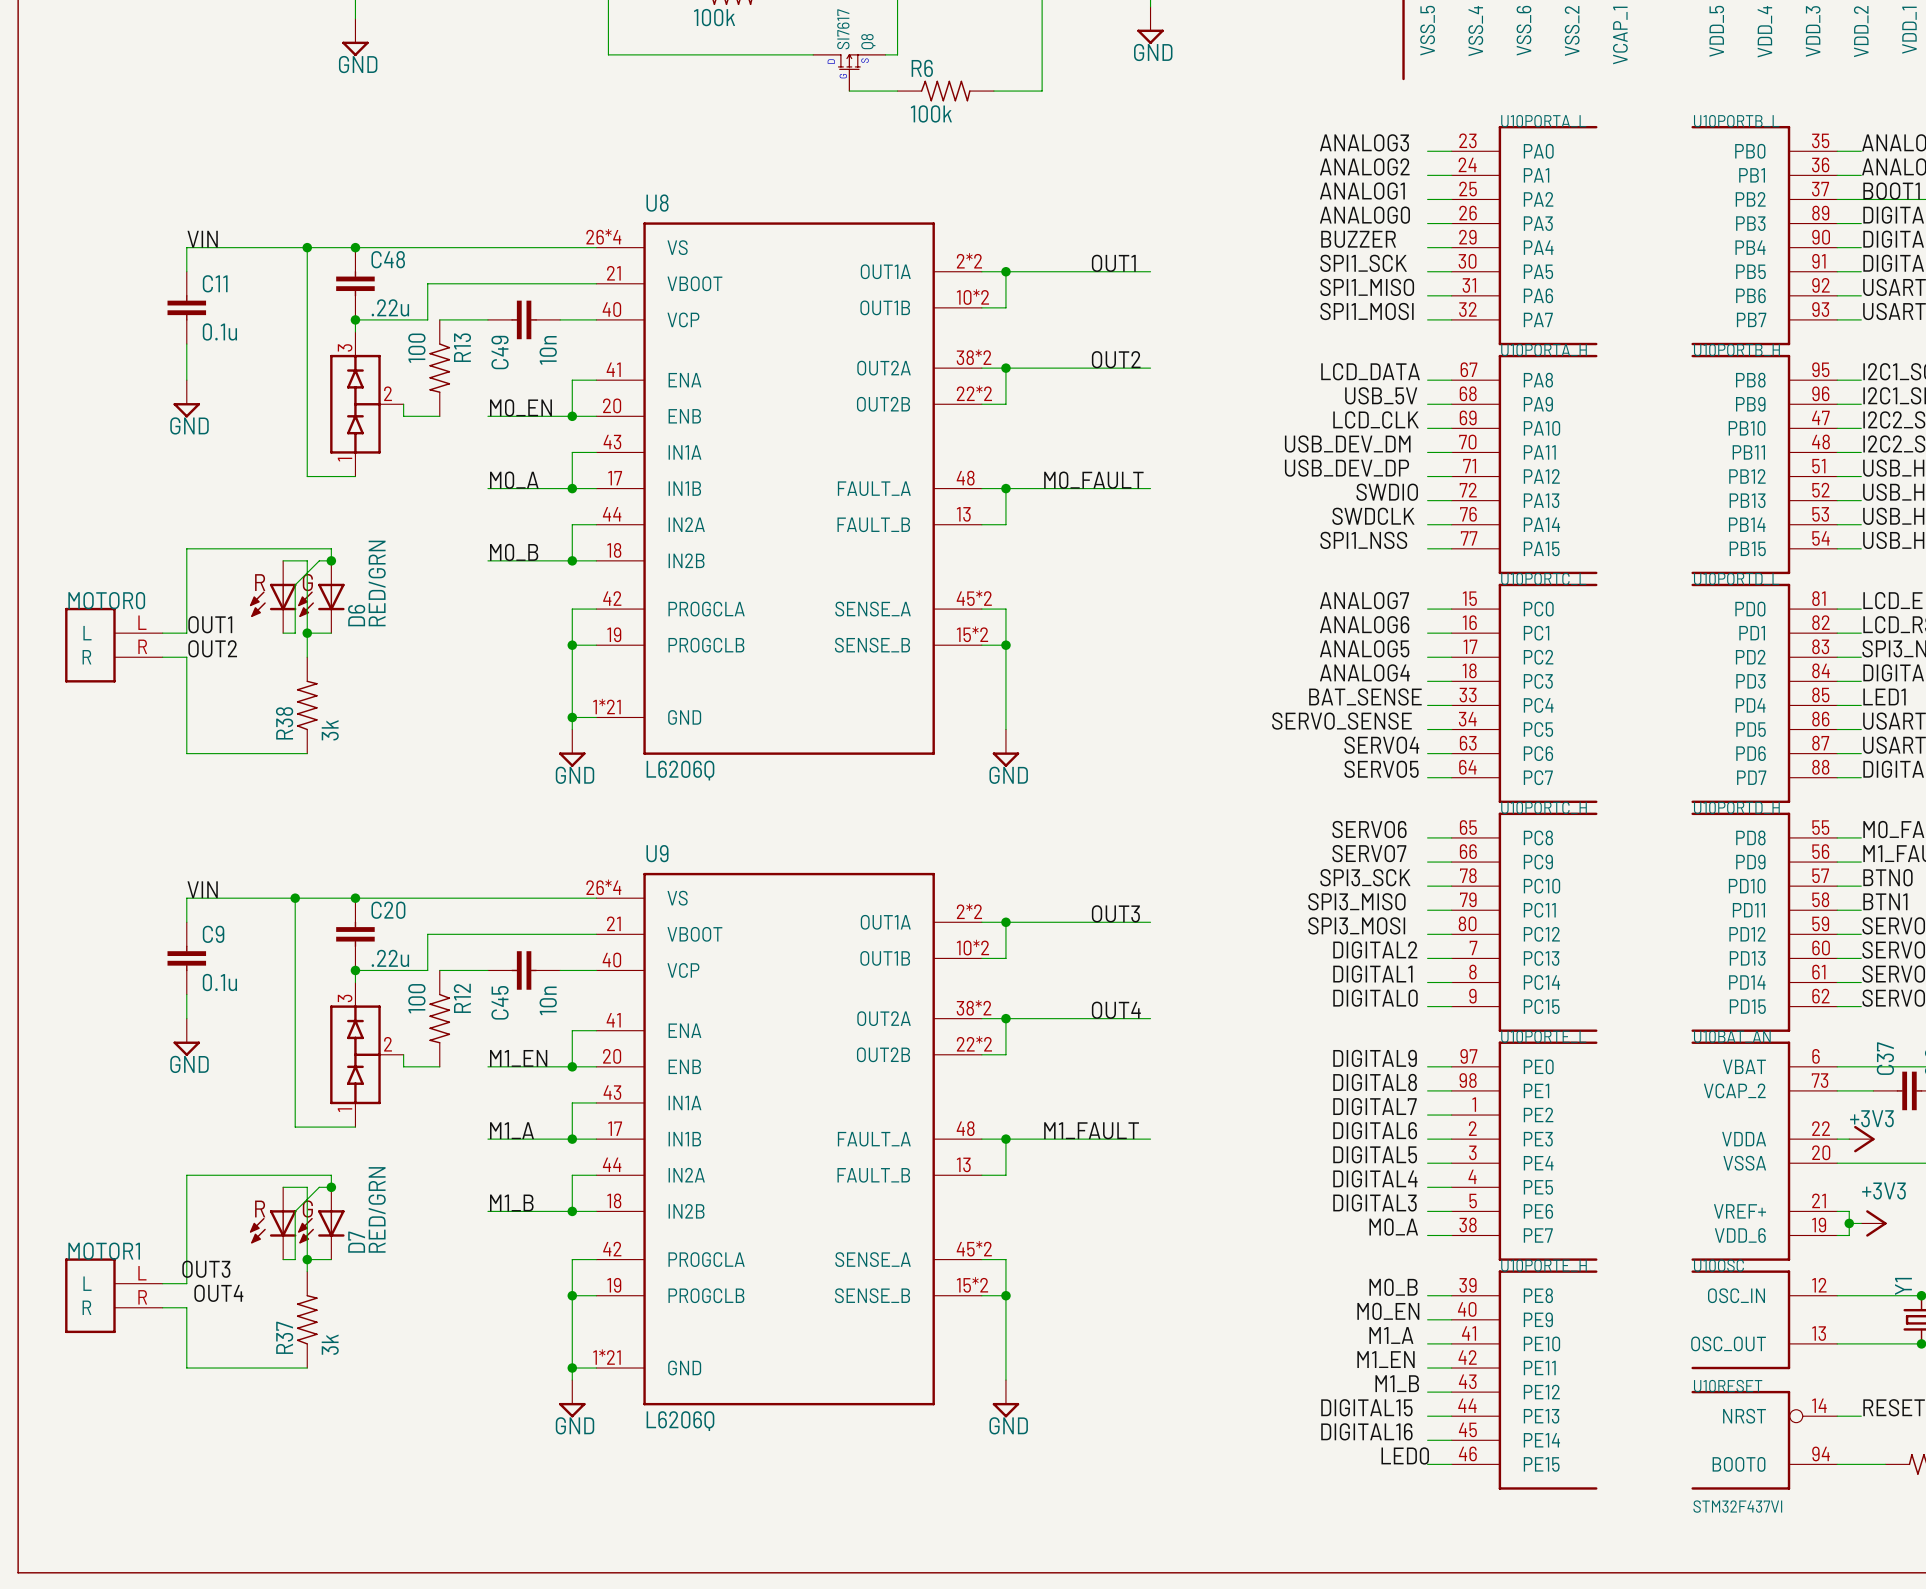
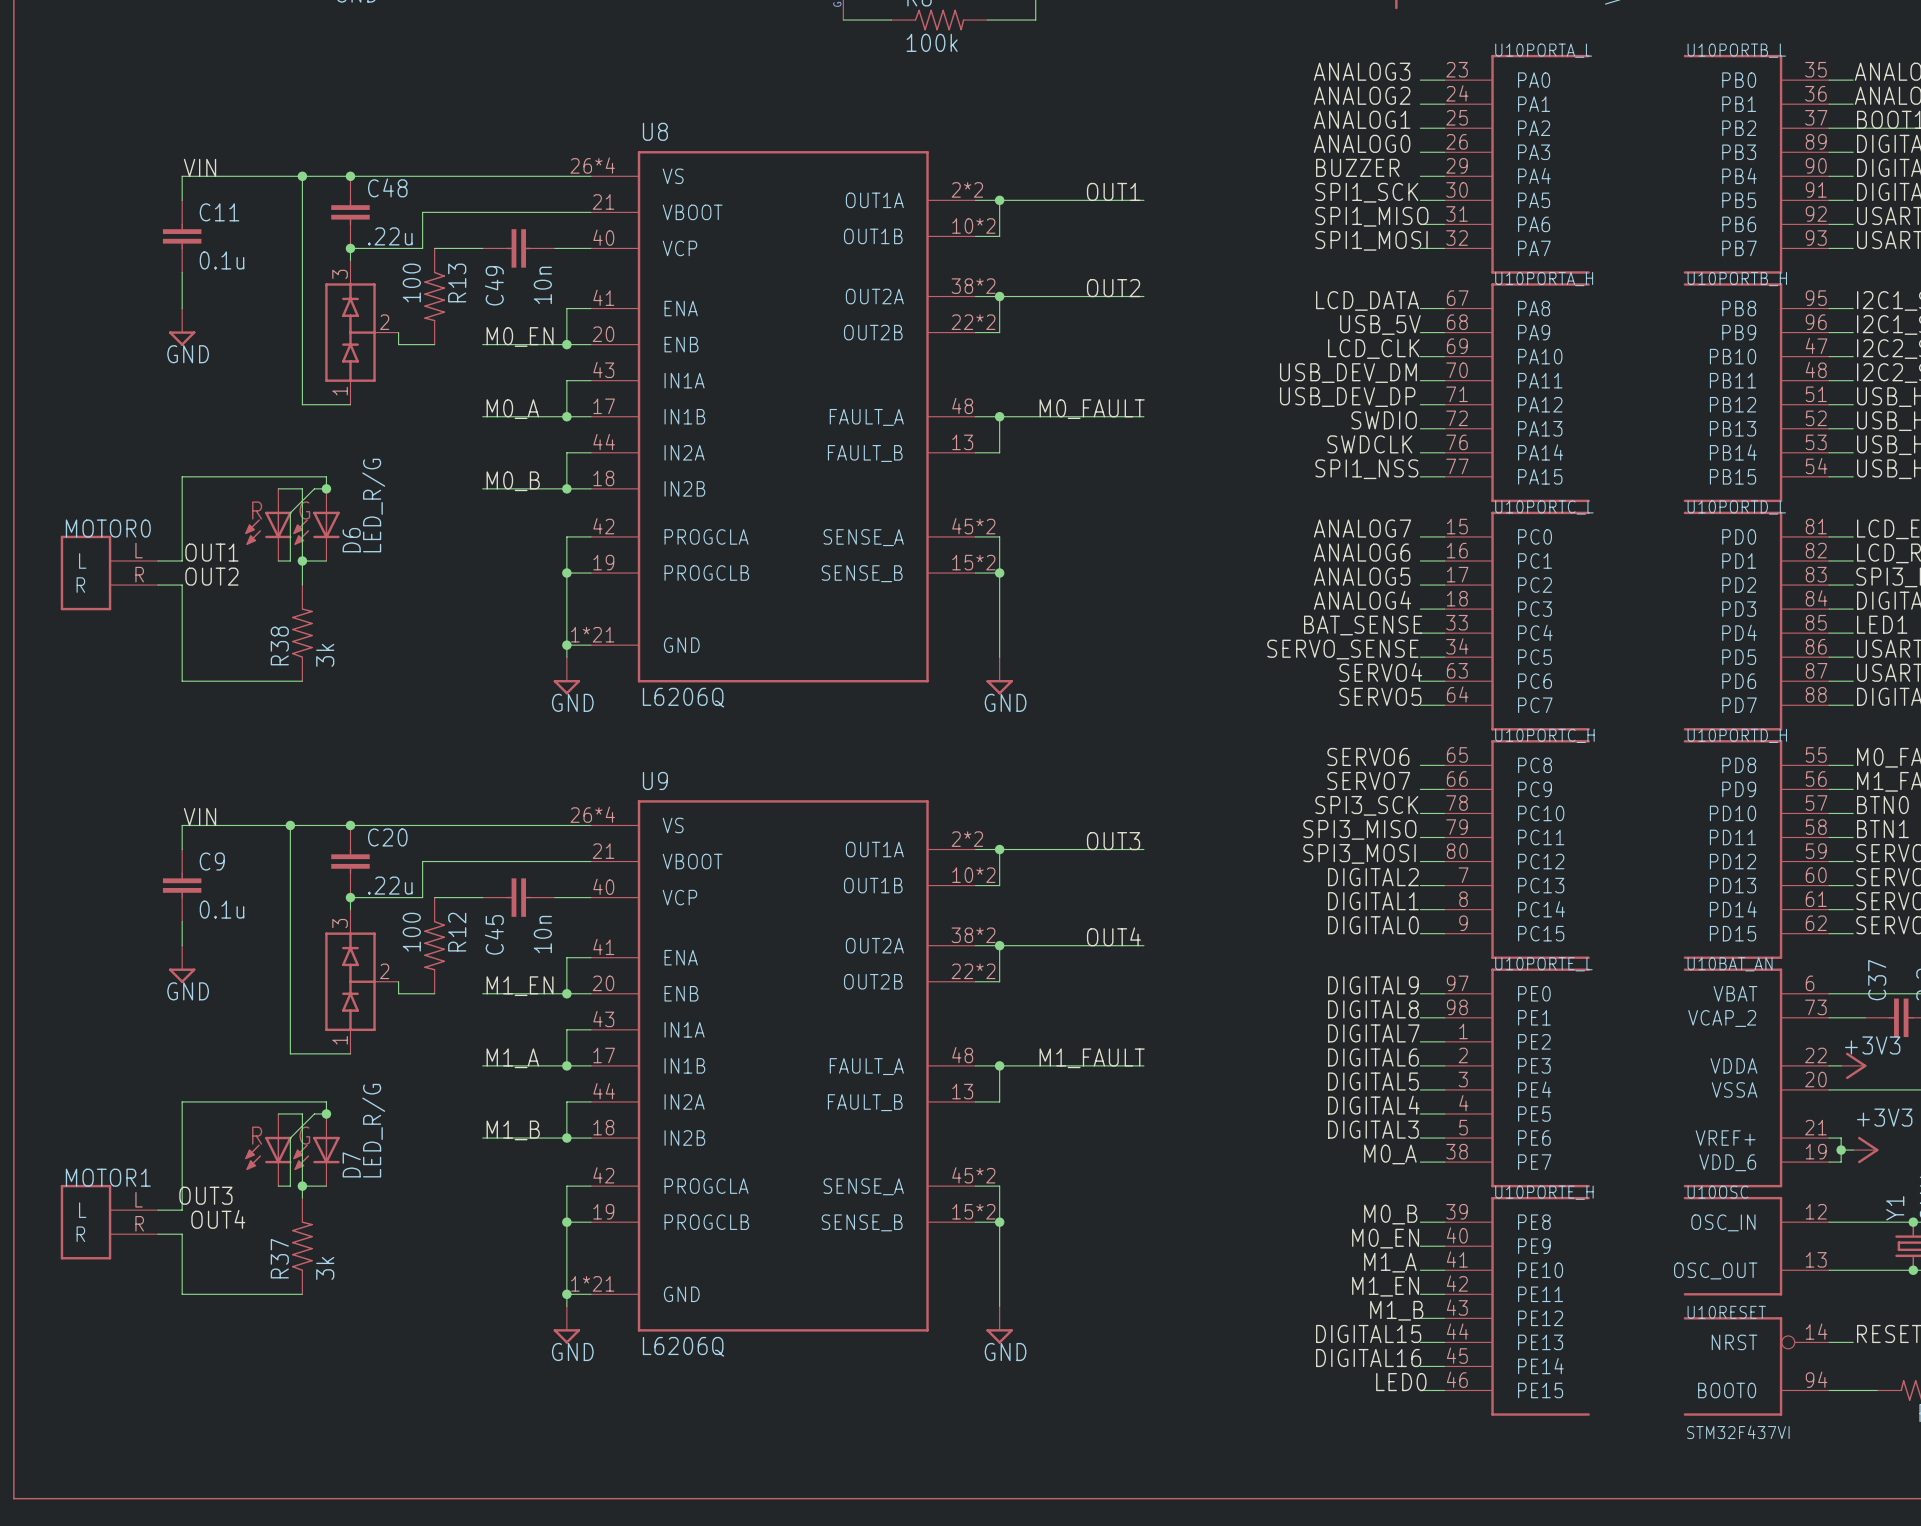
D6 value: RED/GRN (377, 583) -> LED_R/G (373, 505)
D7 value: RED/GRN (377, 1209) -> LED_R/G (373, 1130)

